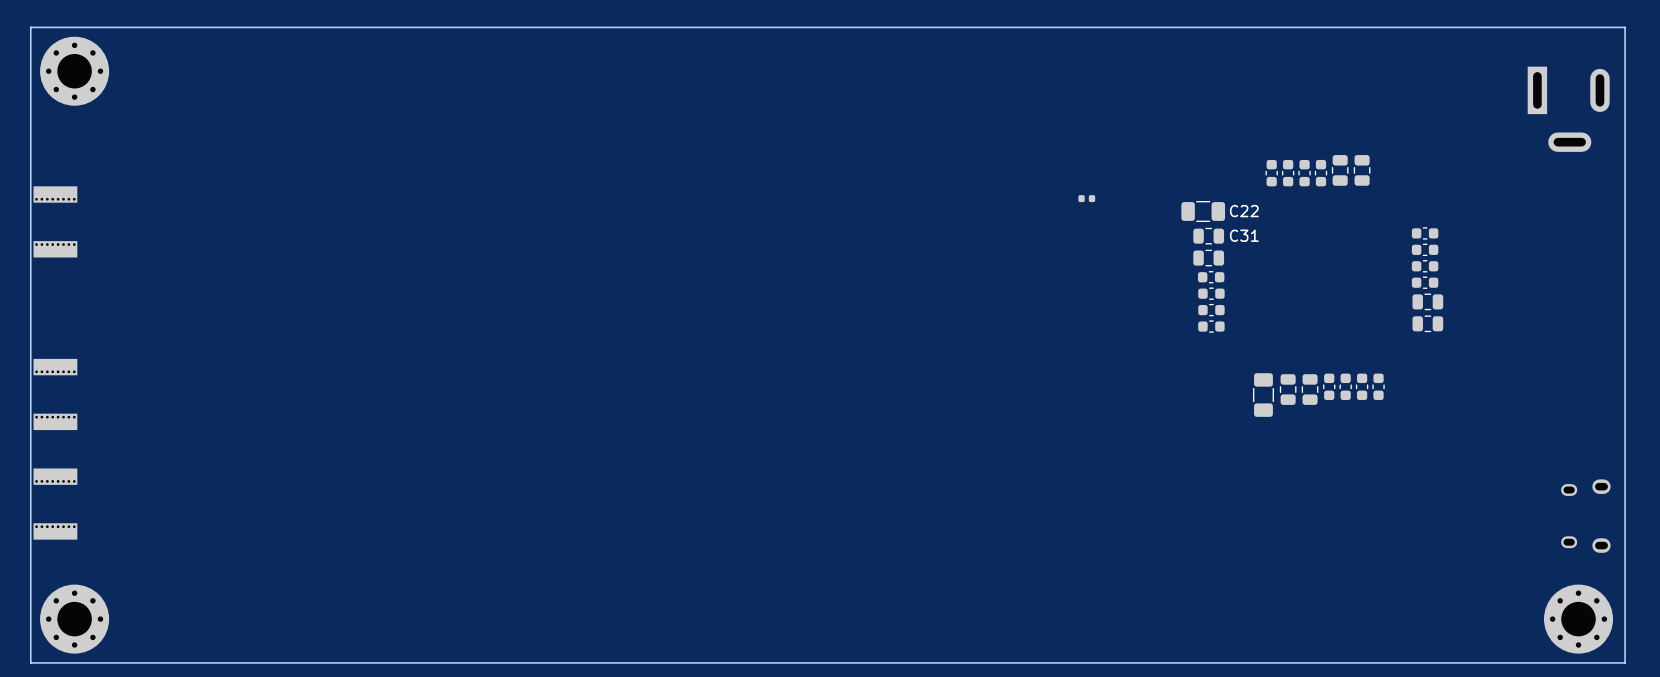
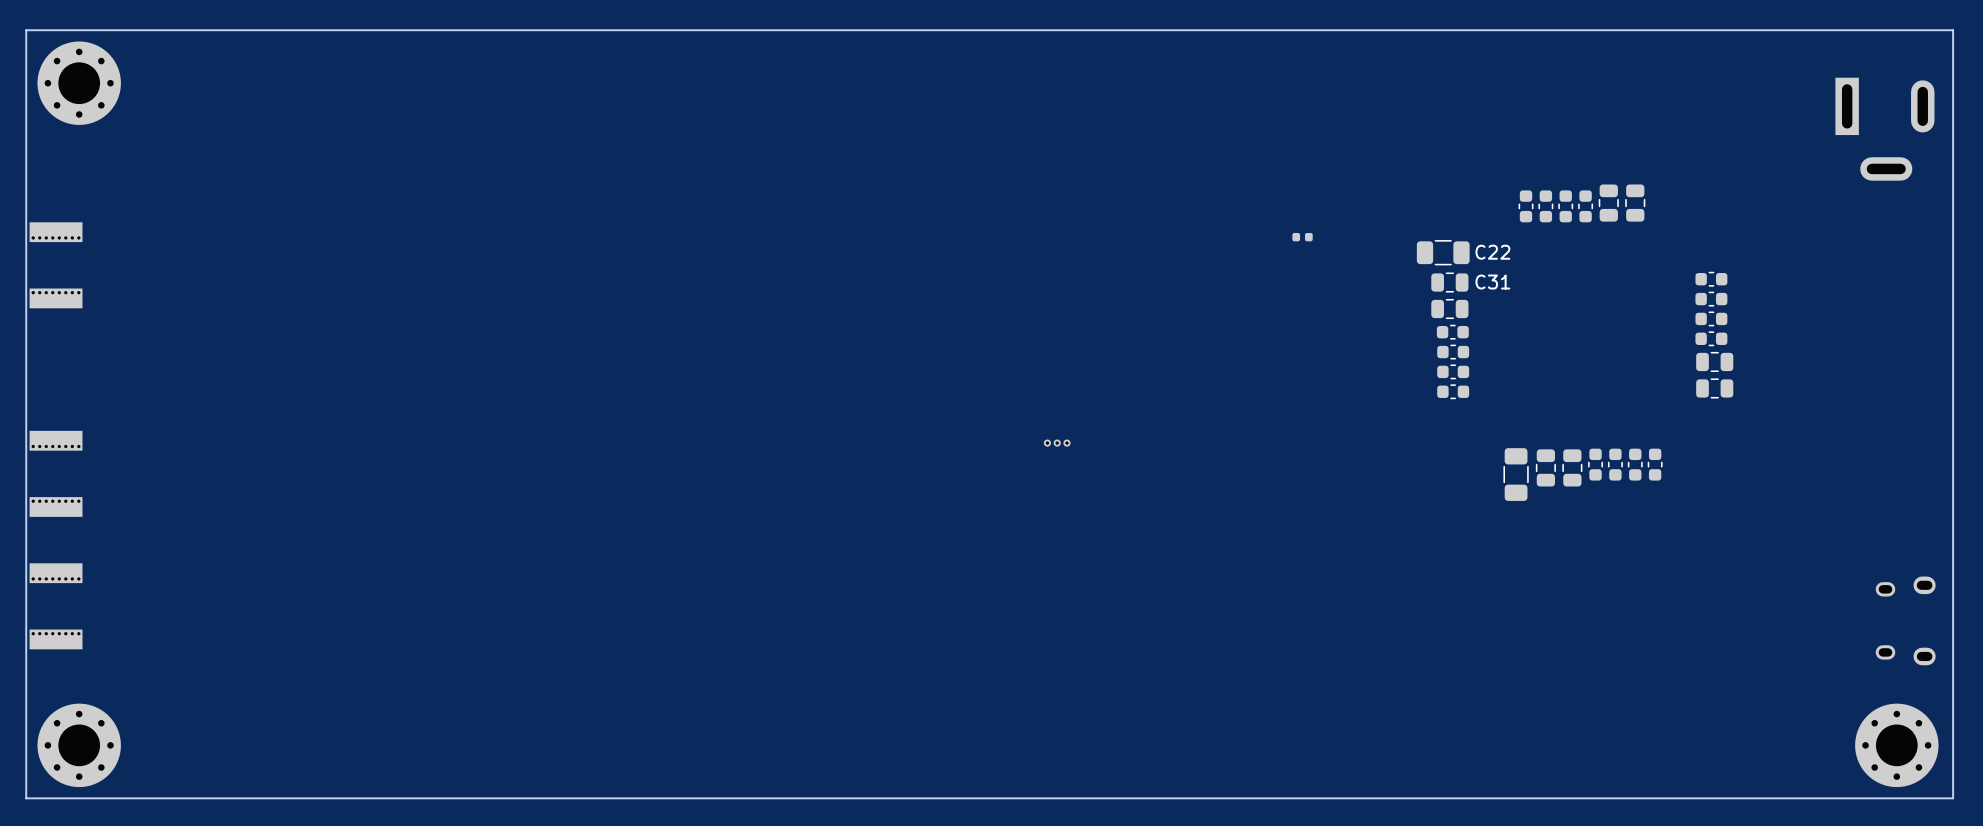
part: none -> (1057, 443)

